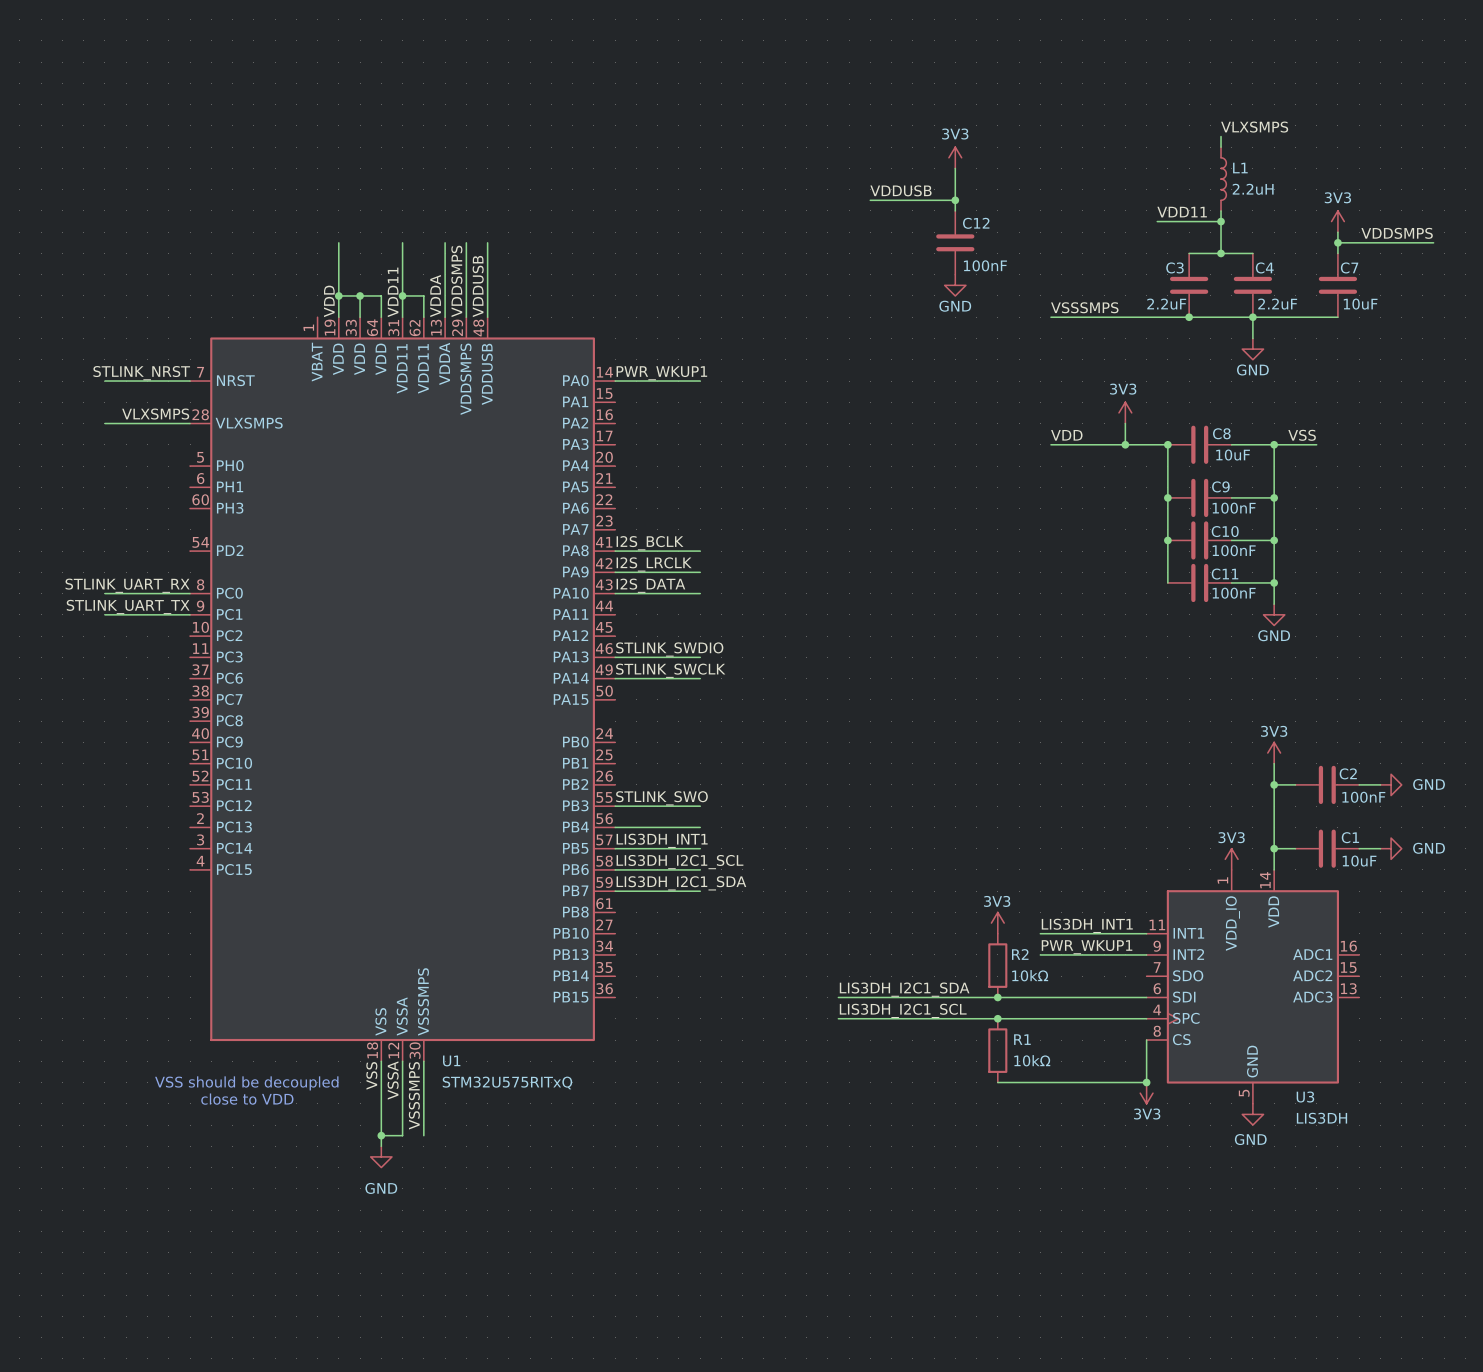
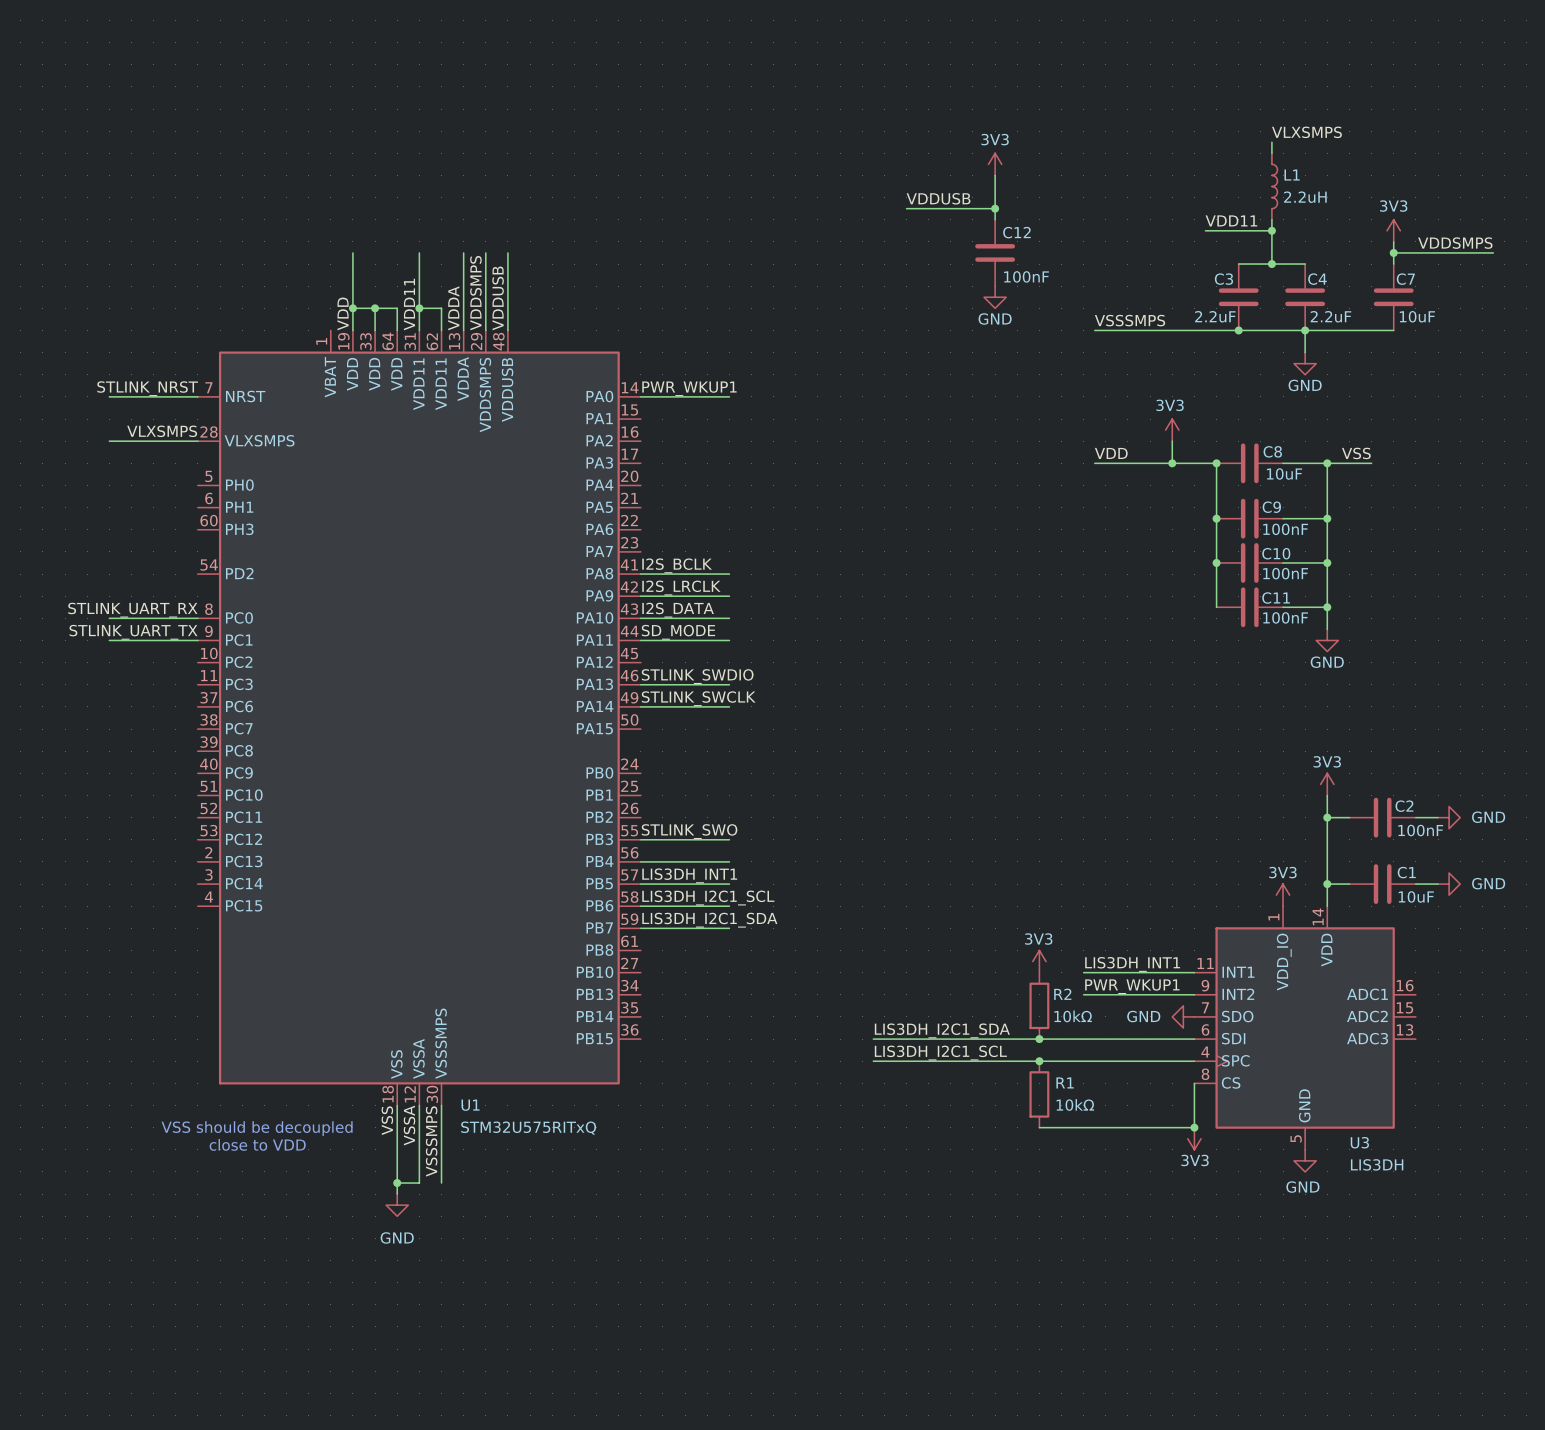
label: none -> SD_MODE (678, 632)
wire: none -> (640, 640) (729, 640)
power symbol: none -> GND (1183, 1016)

